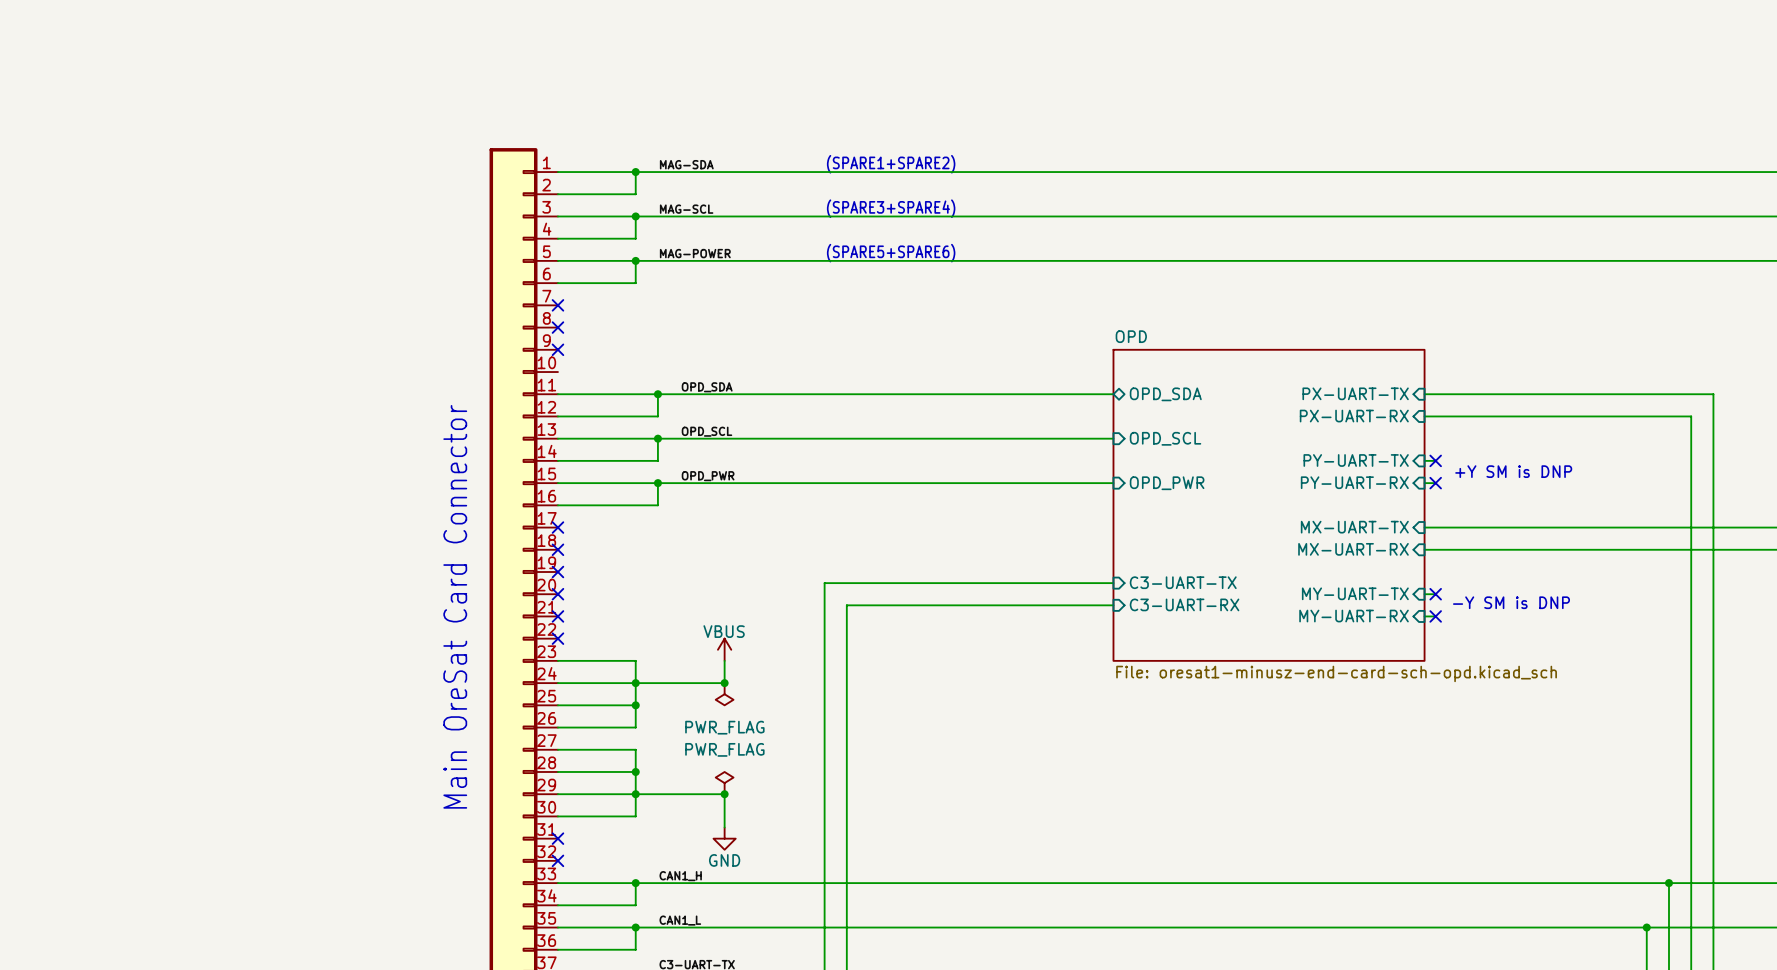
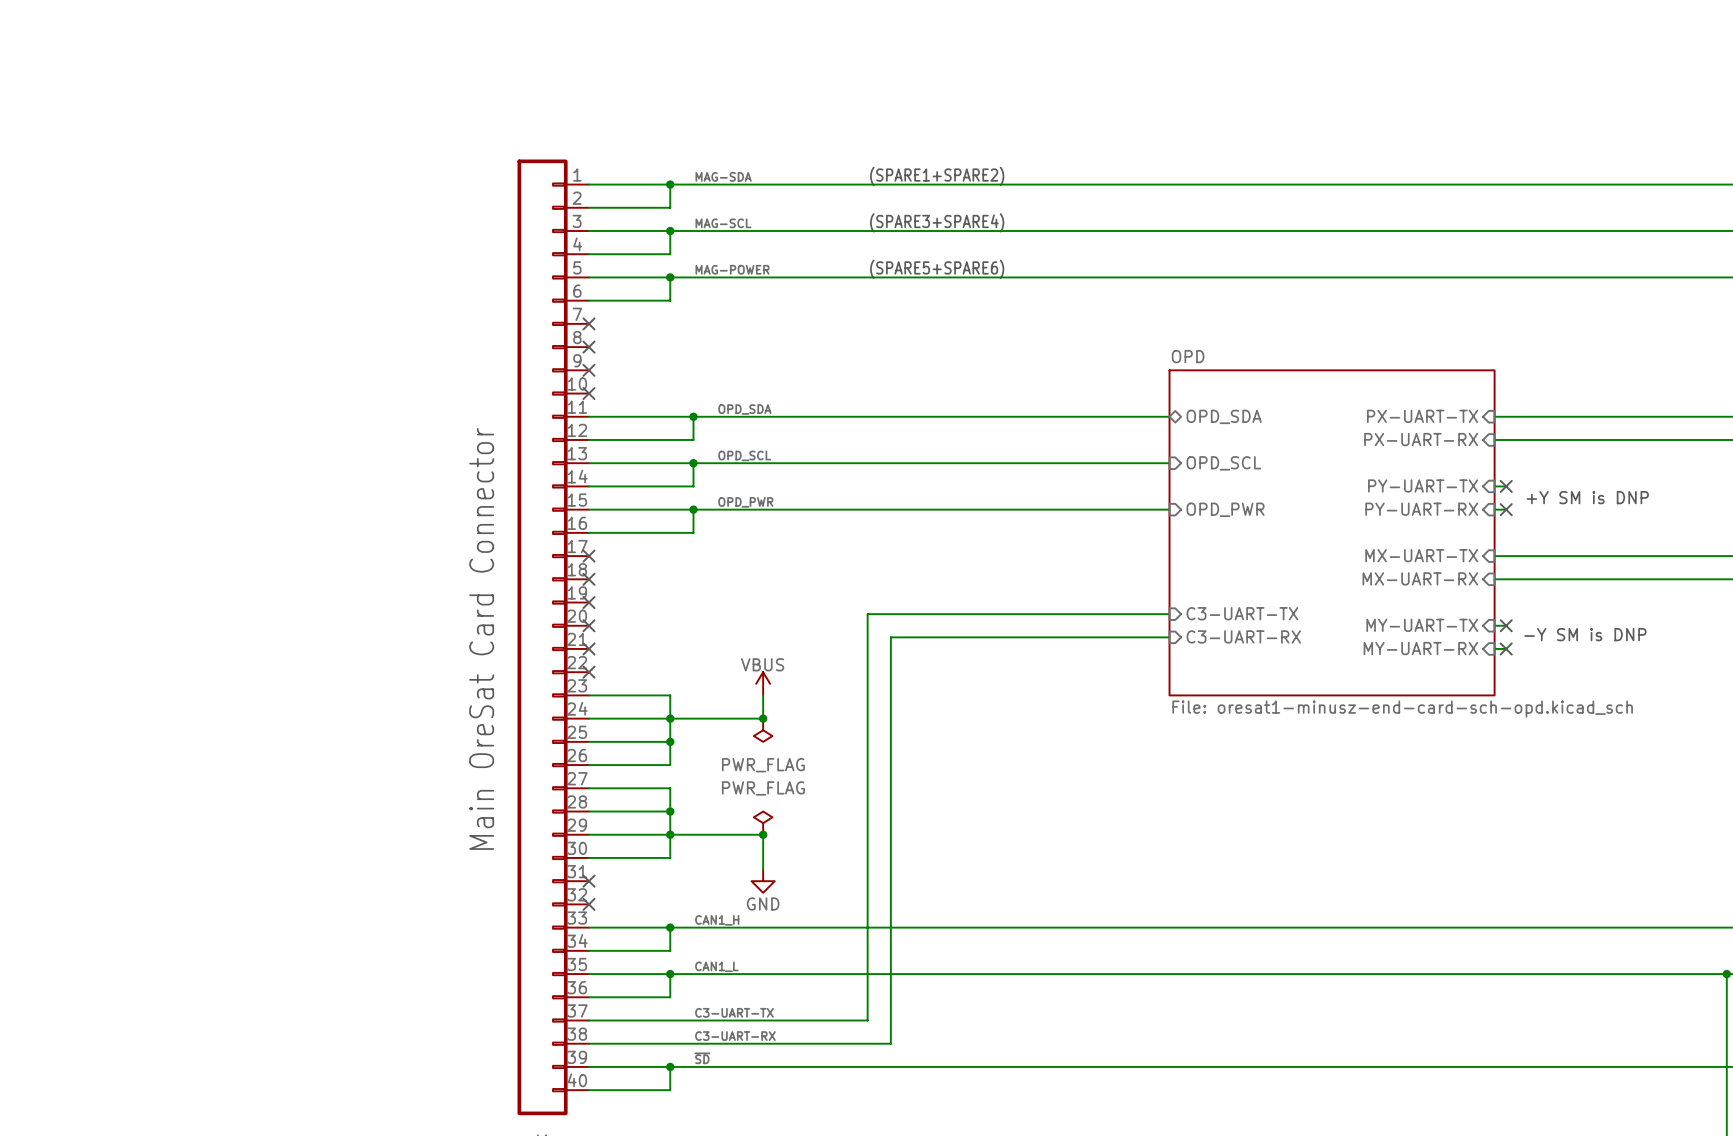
no-connect mark: none -> (588, 393)

